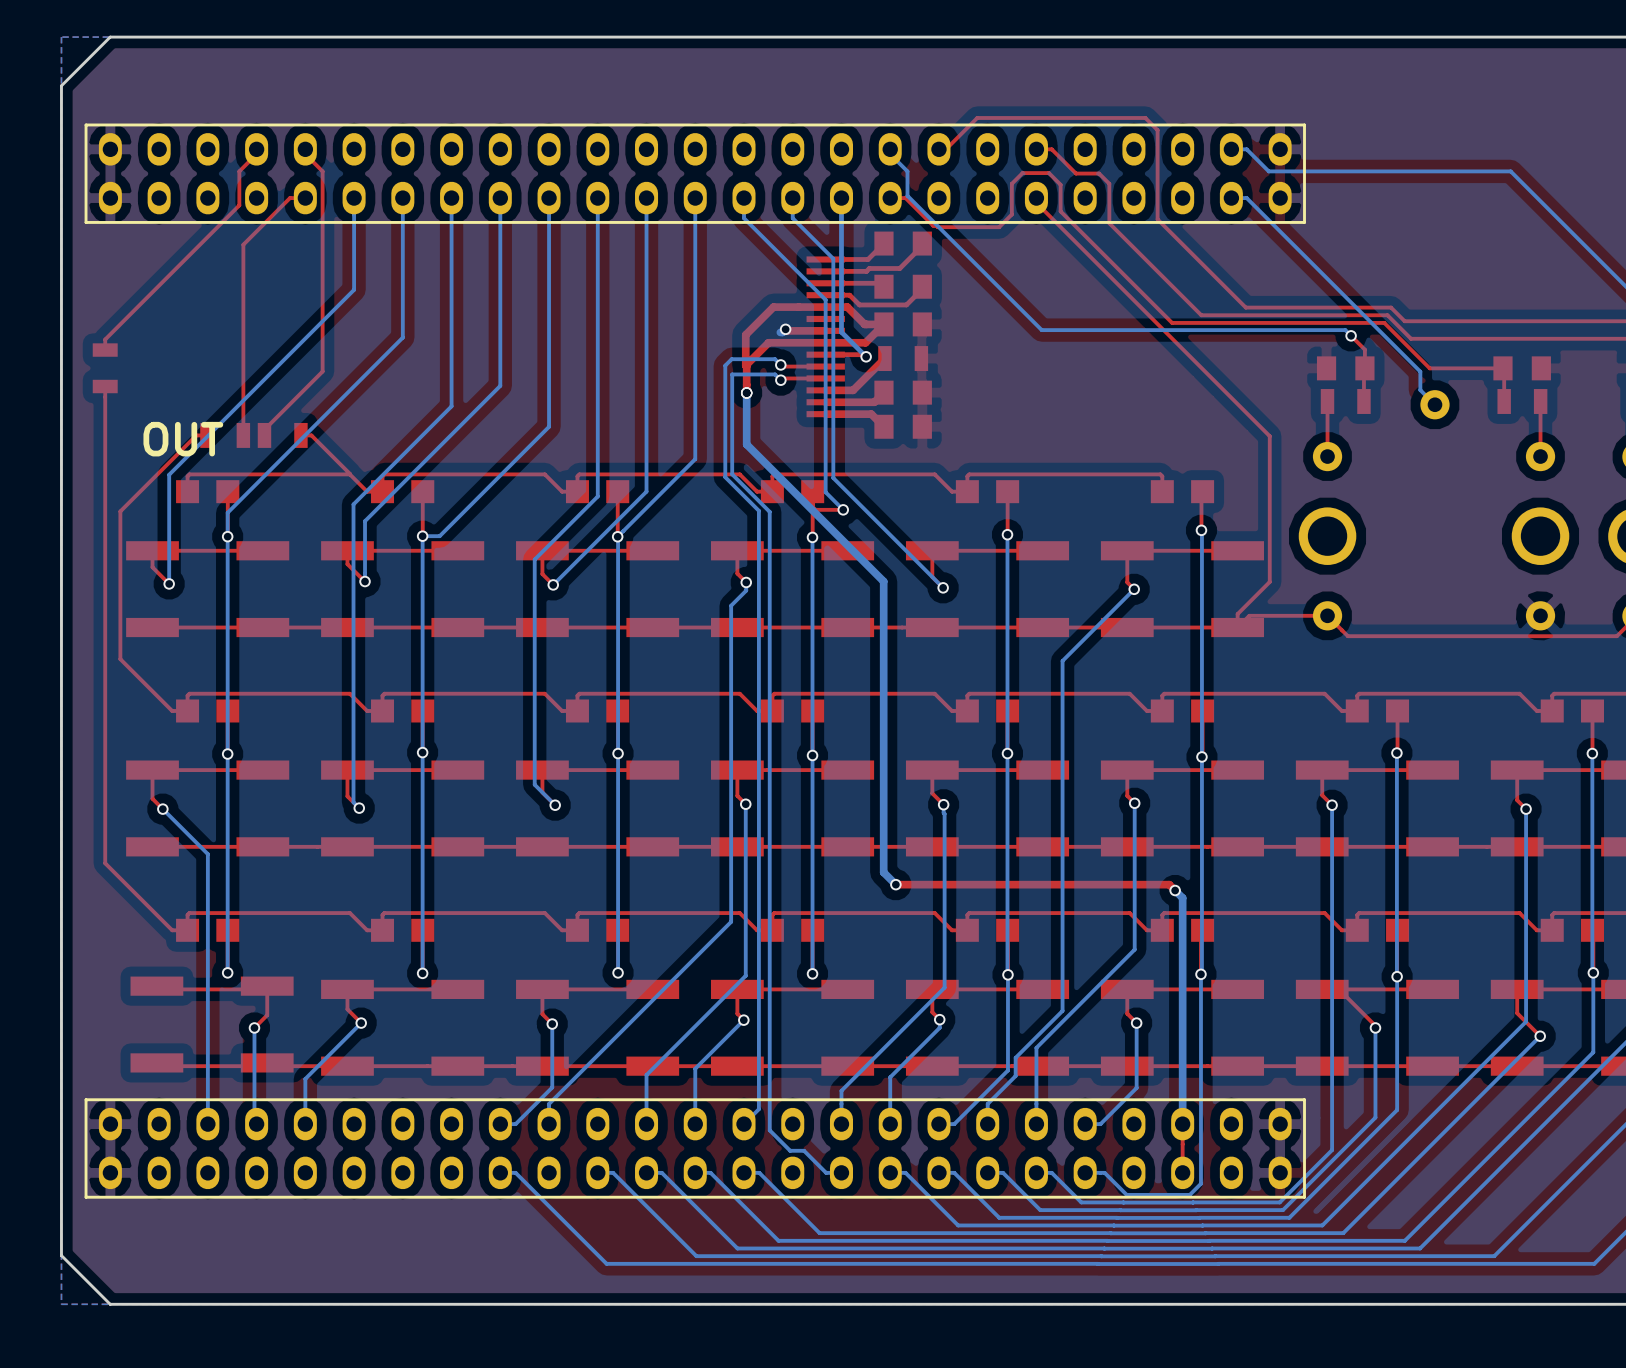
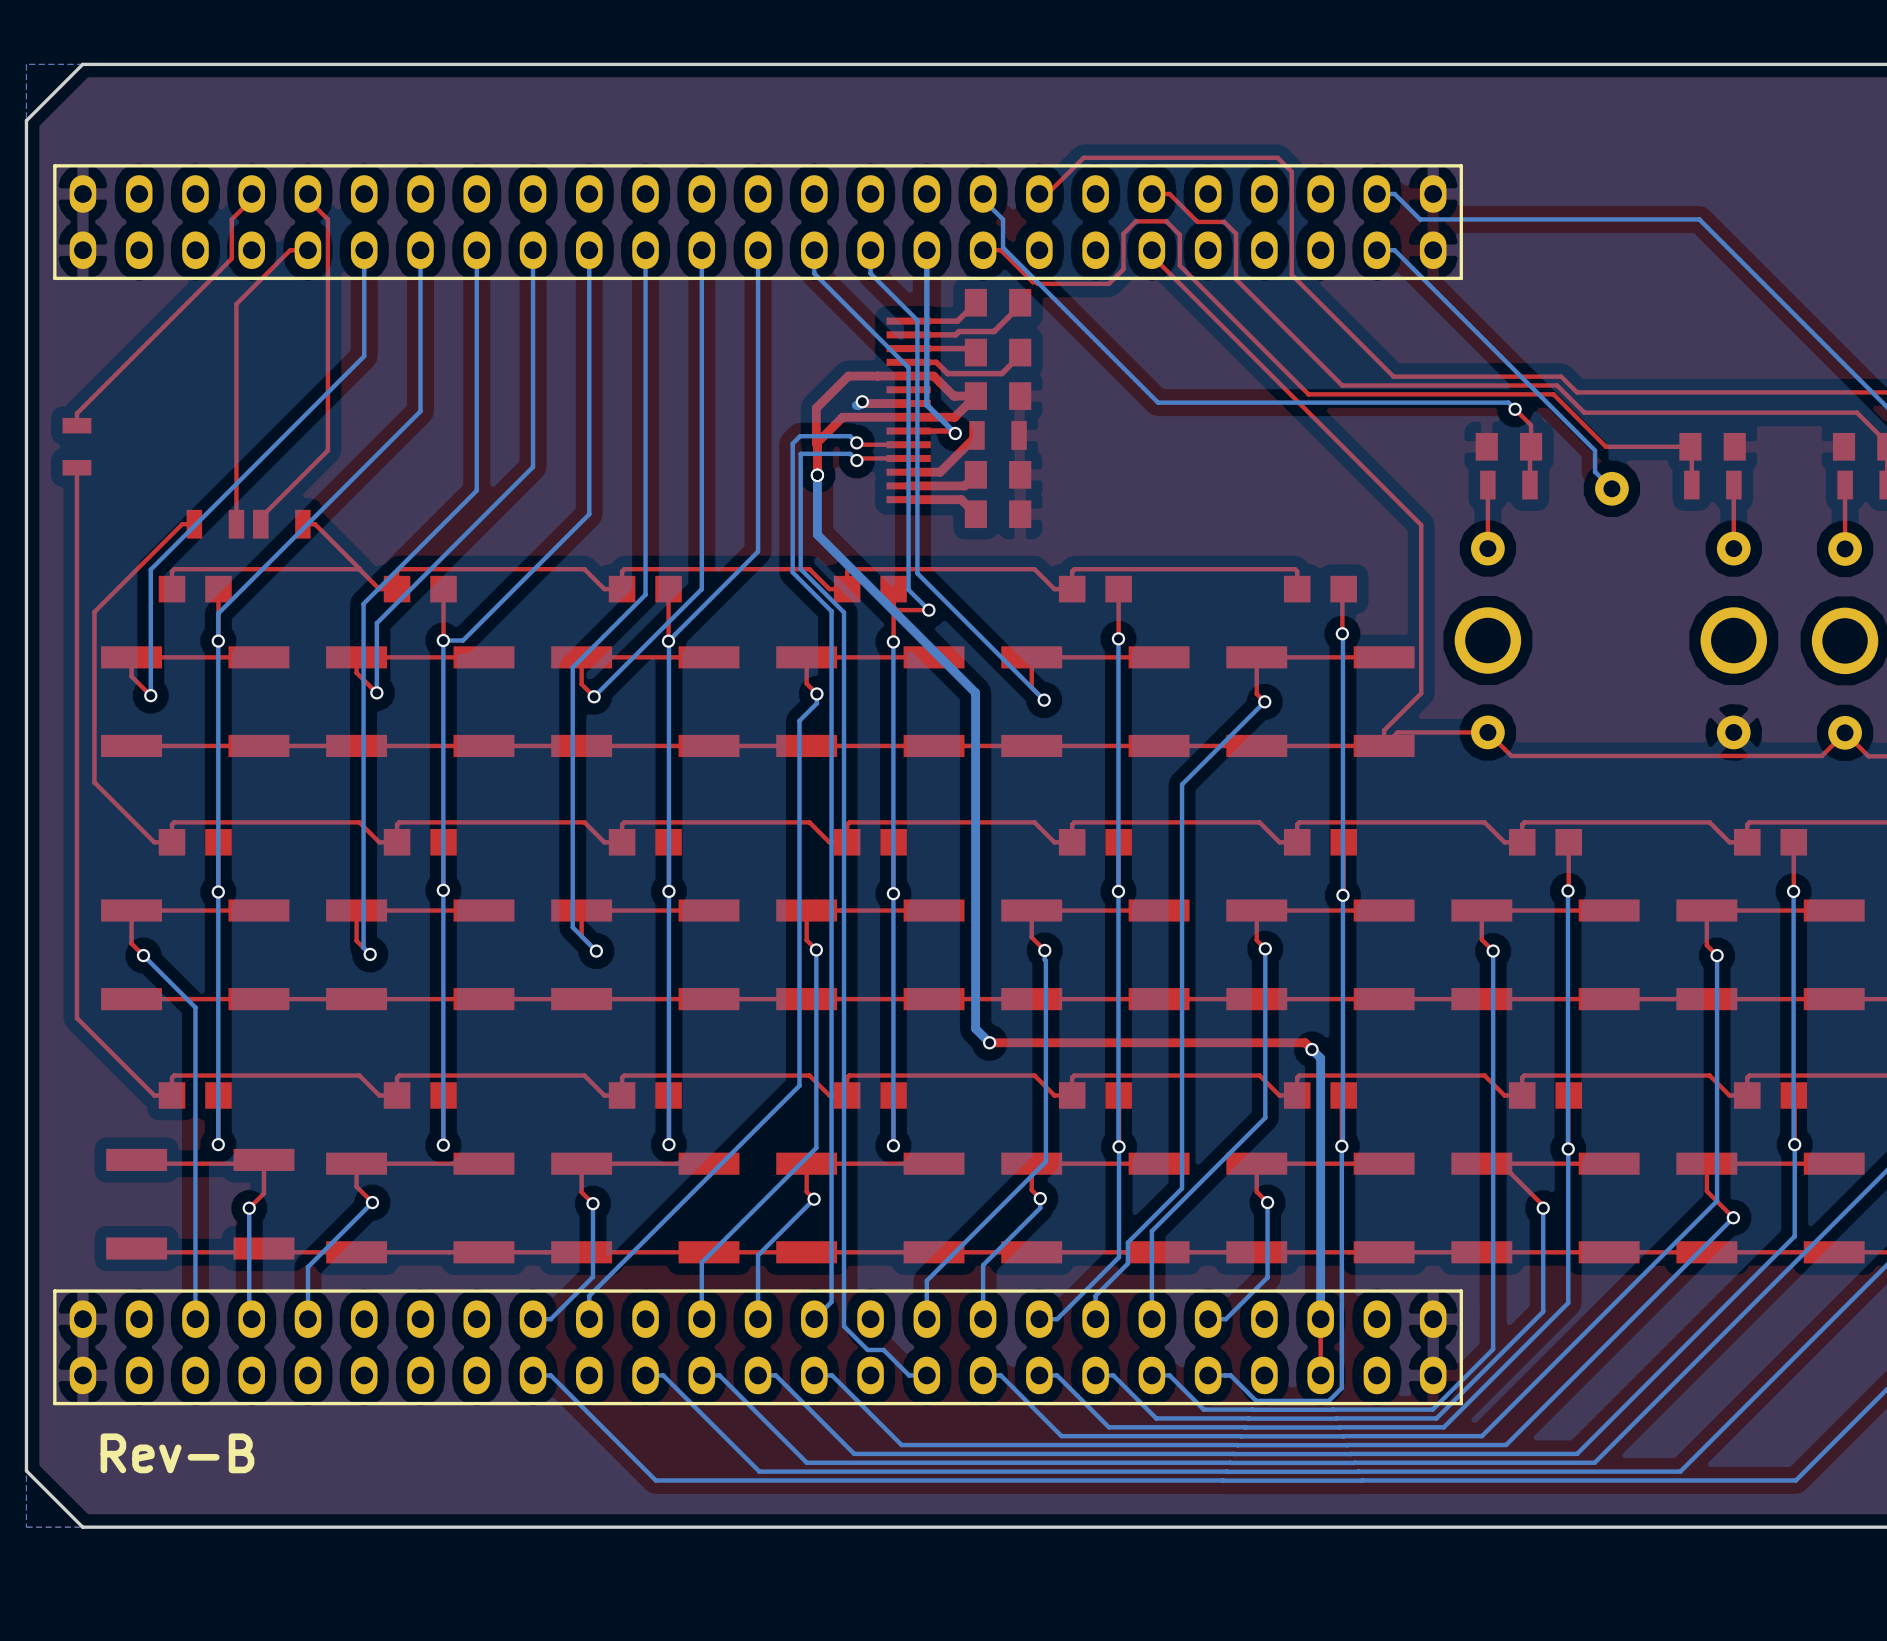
text: OUT (183, 439) -> none
text: none -> Rev-B (177, 1453)

